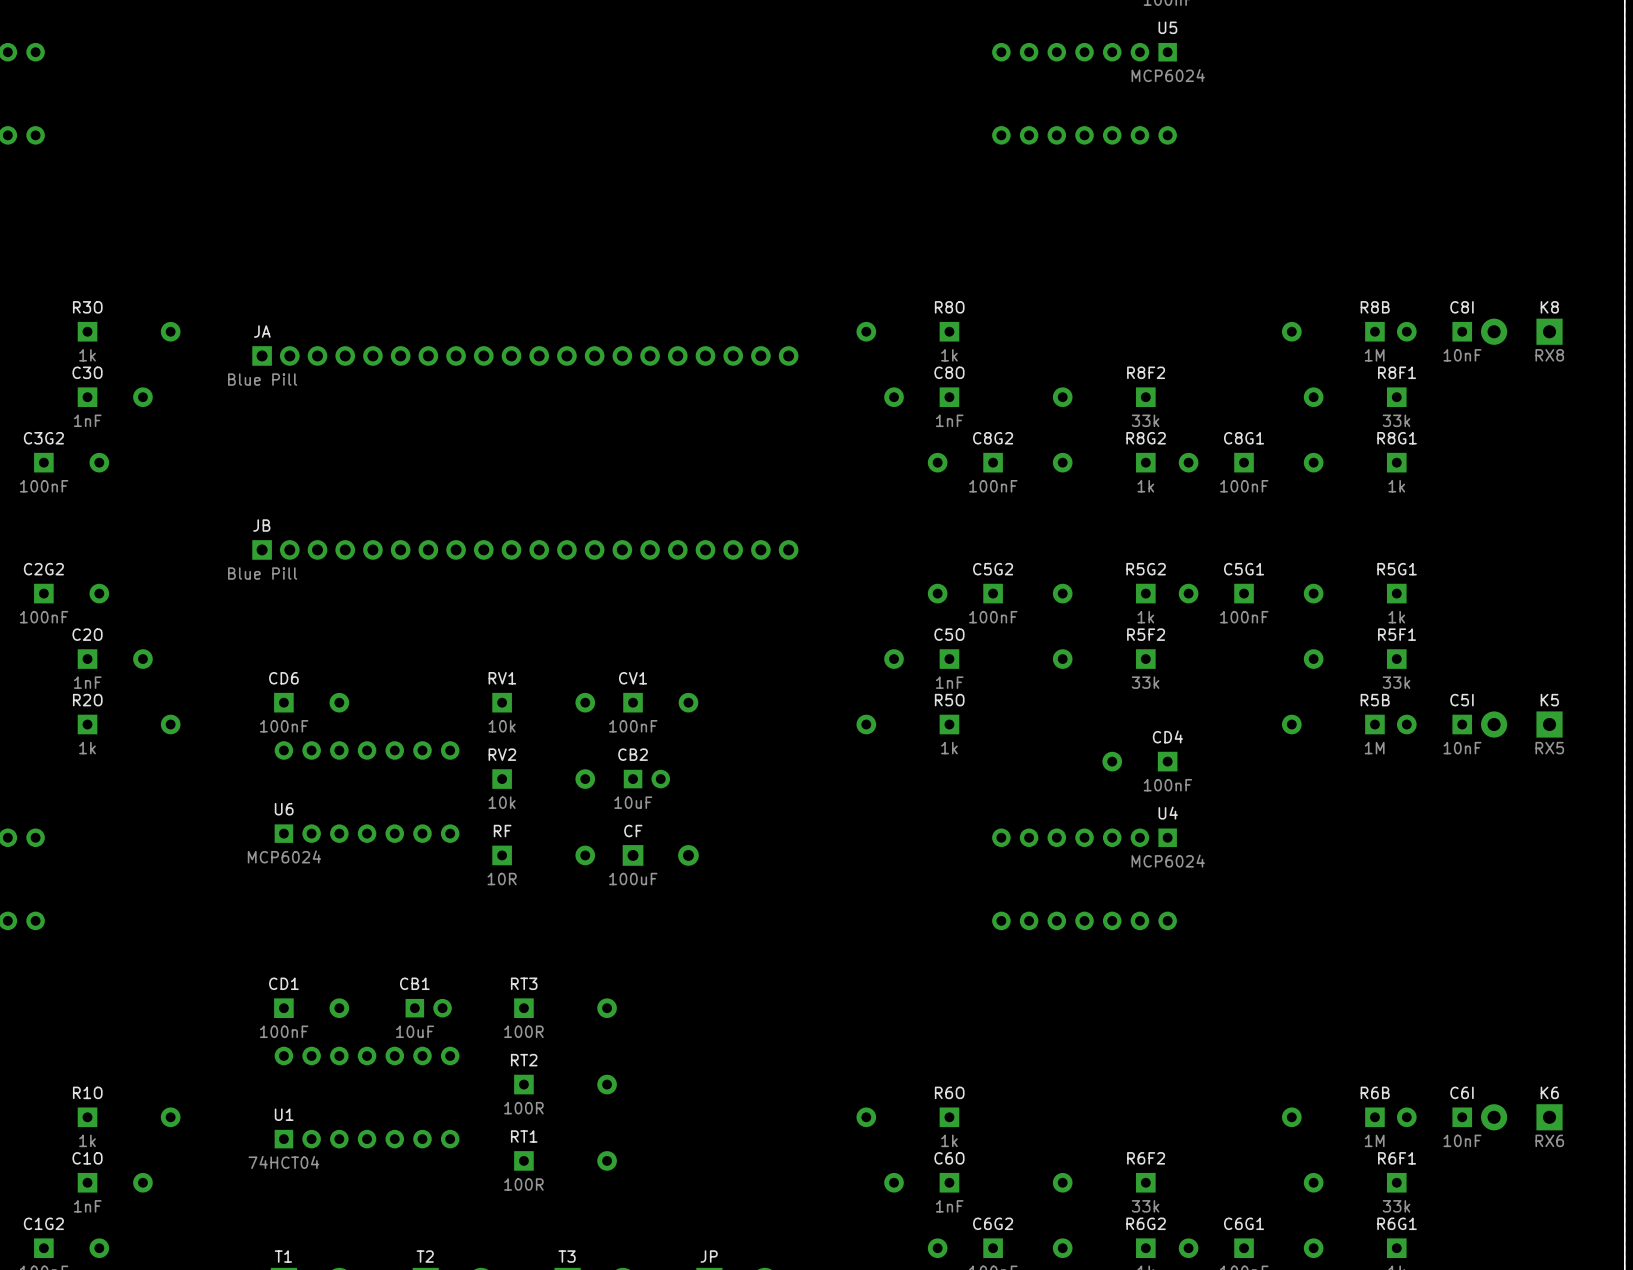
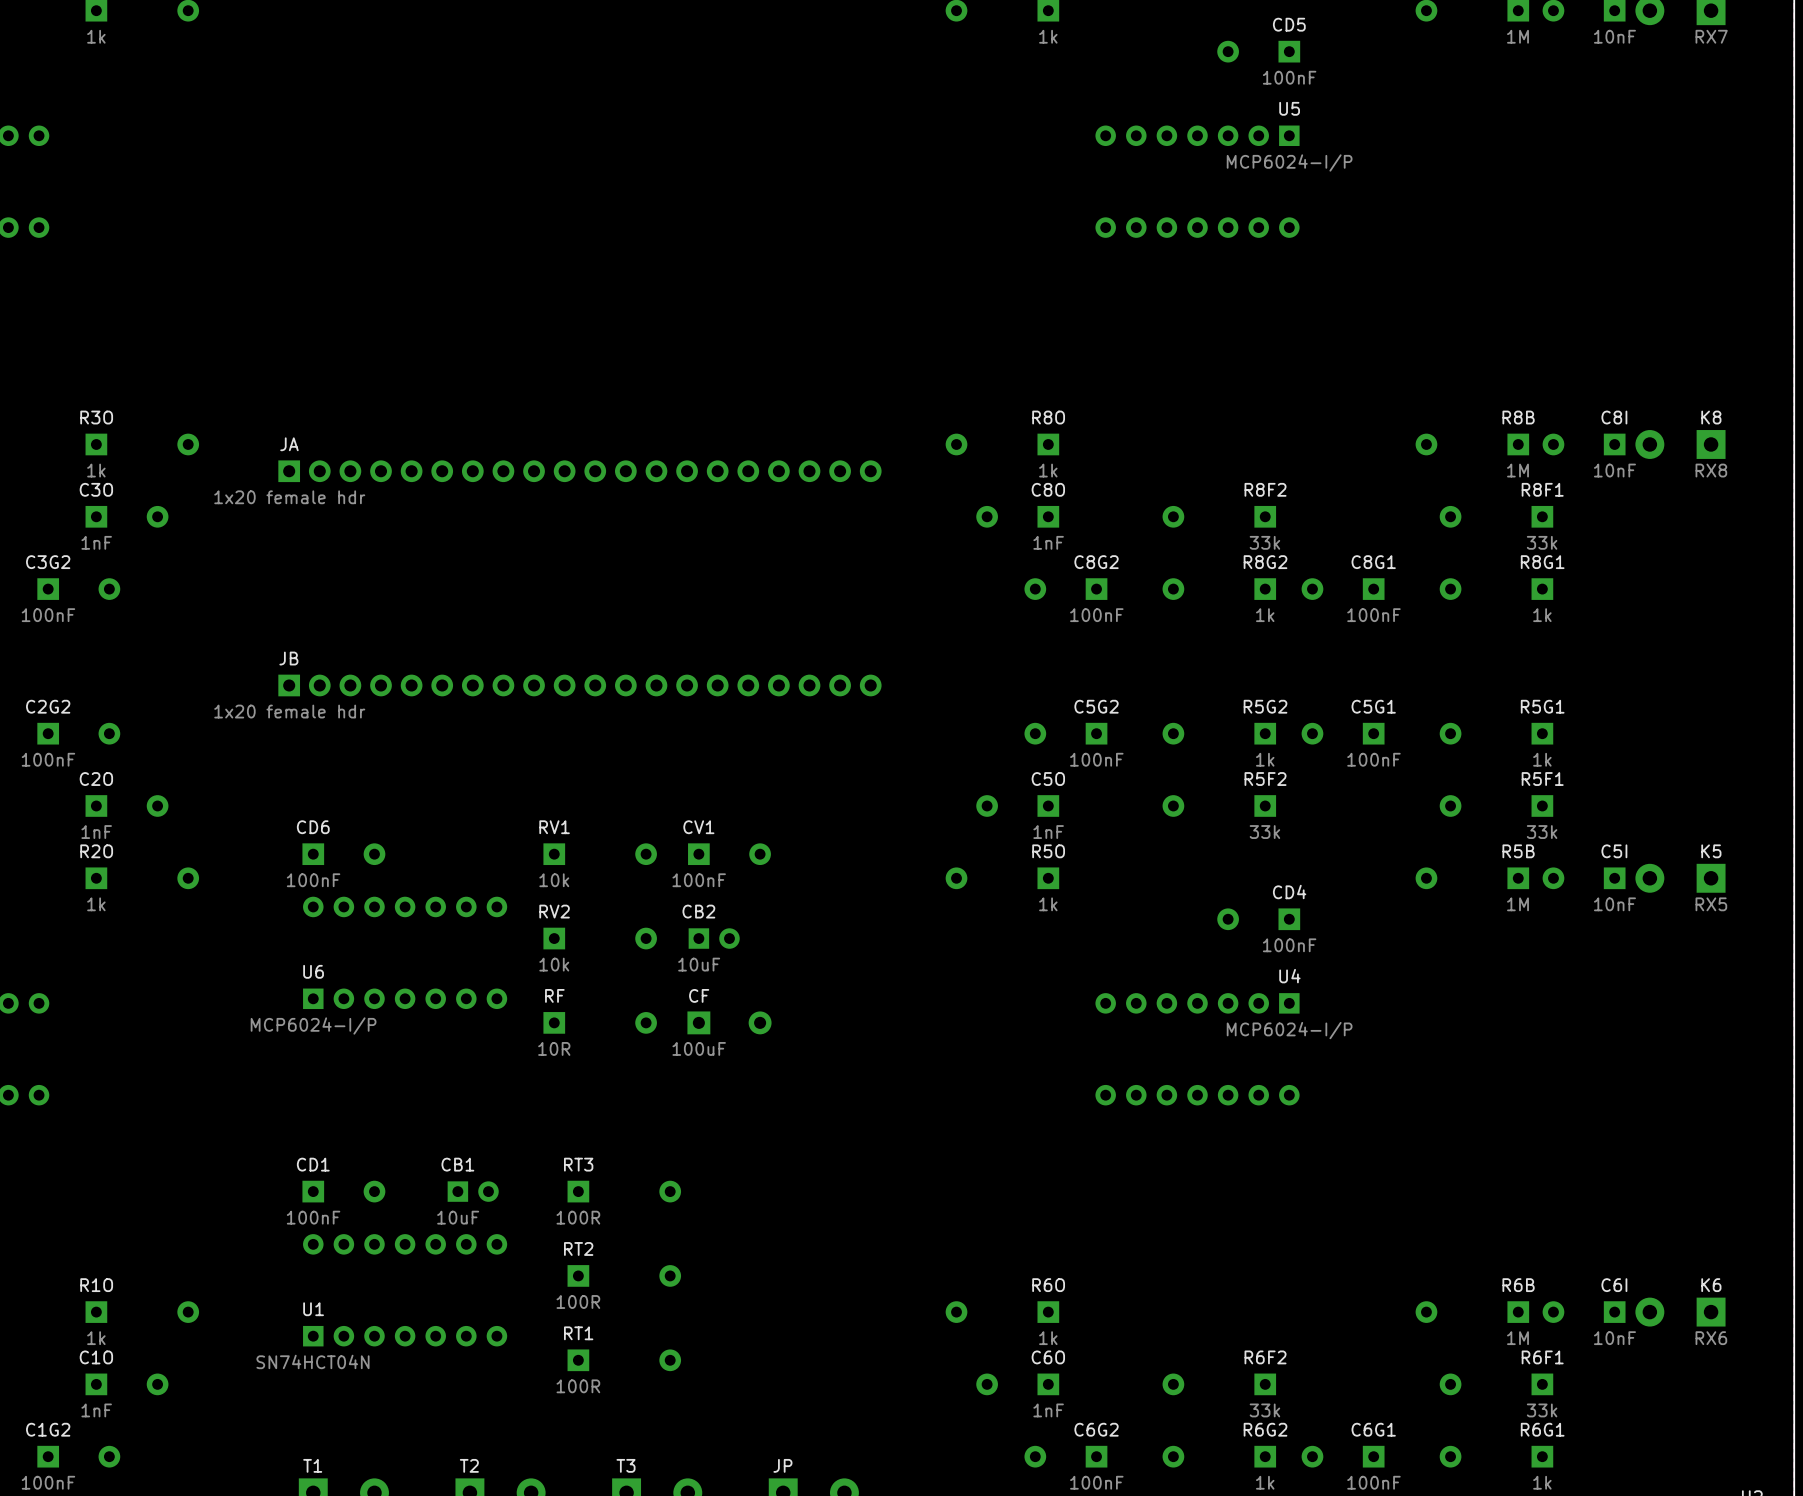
U5 value: MCP6024 (1168, 75) -> MCP6024-I/P (1289, 162)
JA value: Blue Pill (262, 379) -> 1x20 female hdr (289, 497)
JB value: Blue Pill (262, 573) -> 1x20 female hdr (289, 711)
U6 value: MCP6024 (284, 856) -> MCP6024-I/P (313, 1025)
U4 value: MCP6024 (1168, 861) -> MCP6024-I/P (1289, 1030)
U1 value: 74HCT04 (283, 1162) -> SN74HCT04N (312, 1361)

